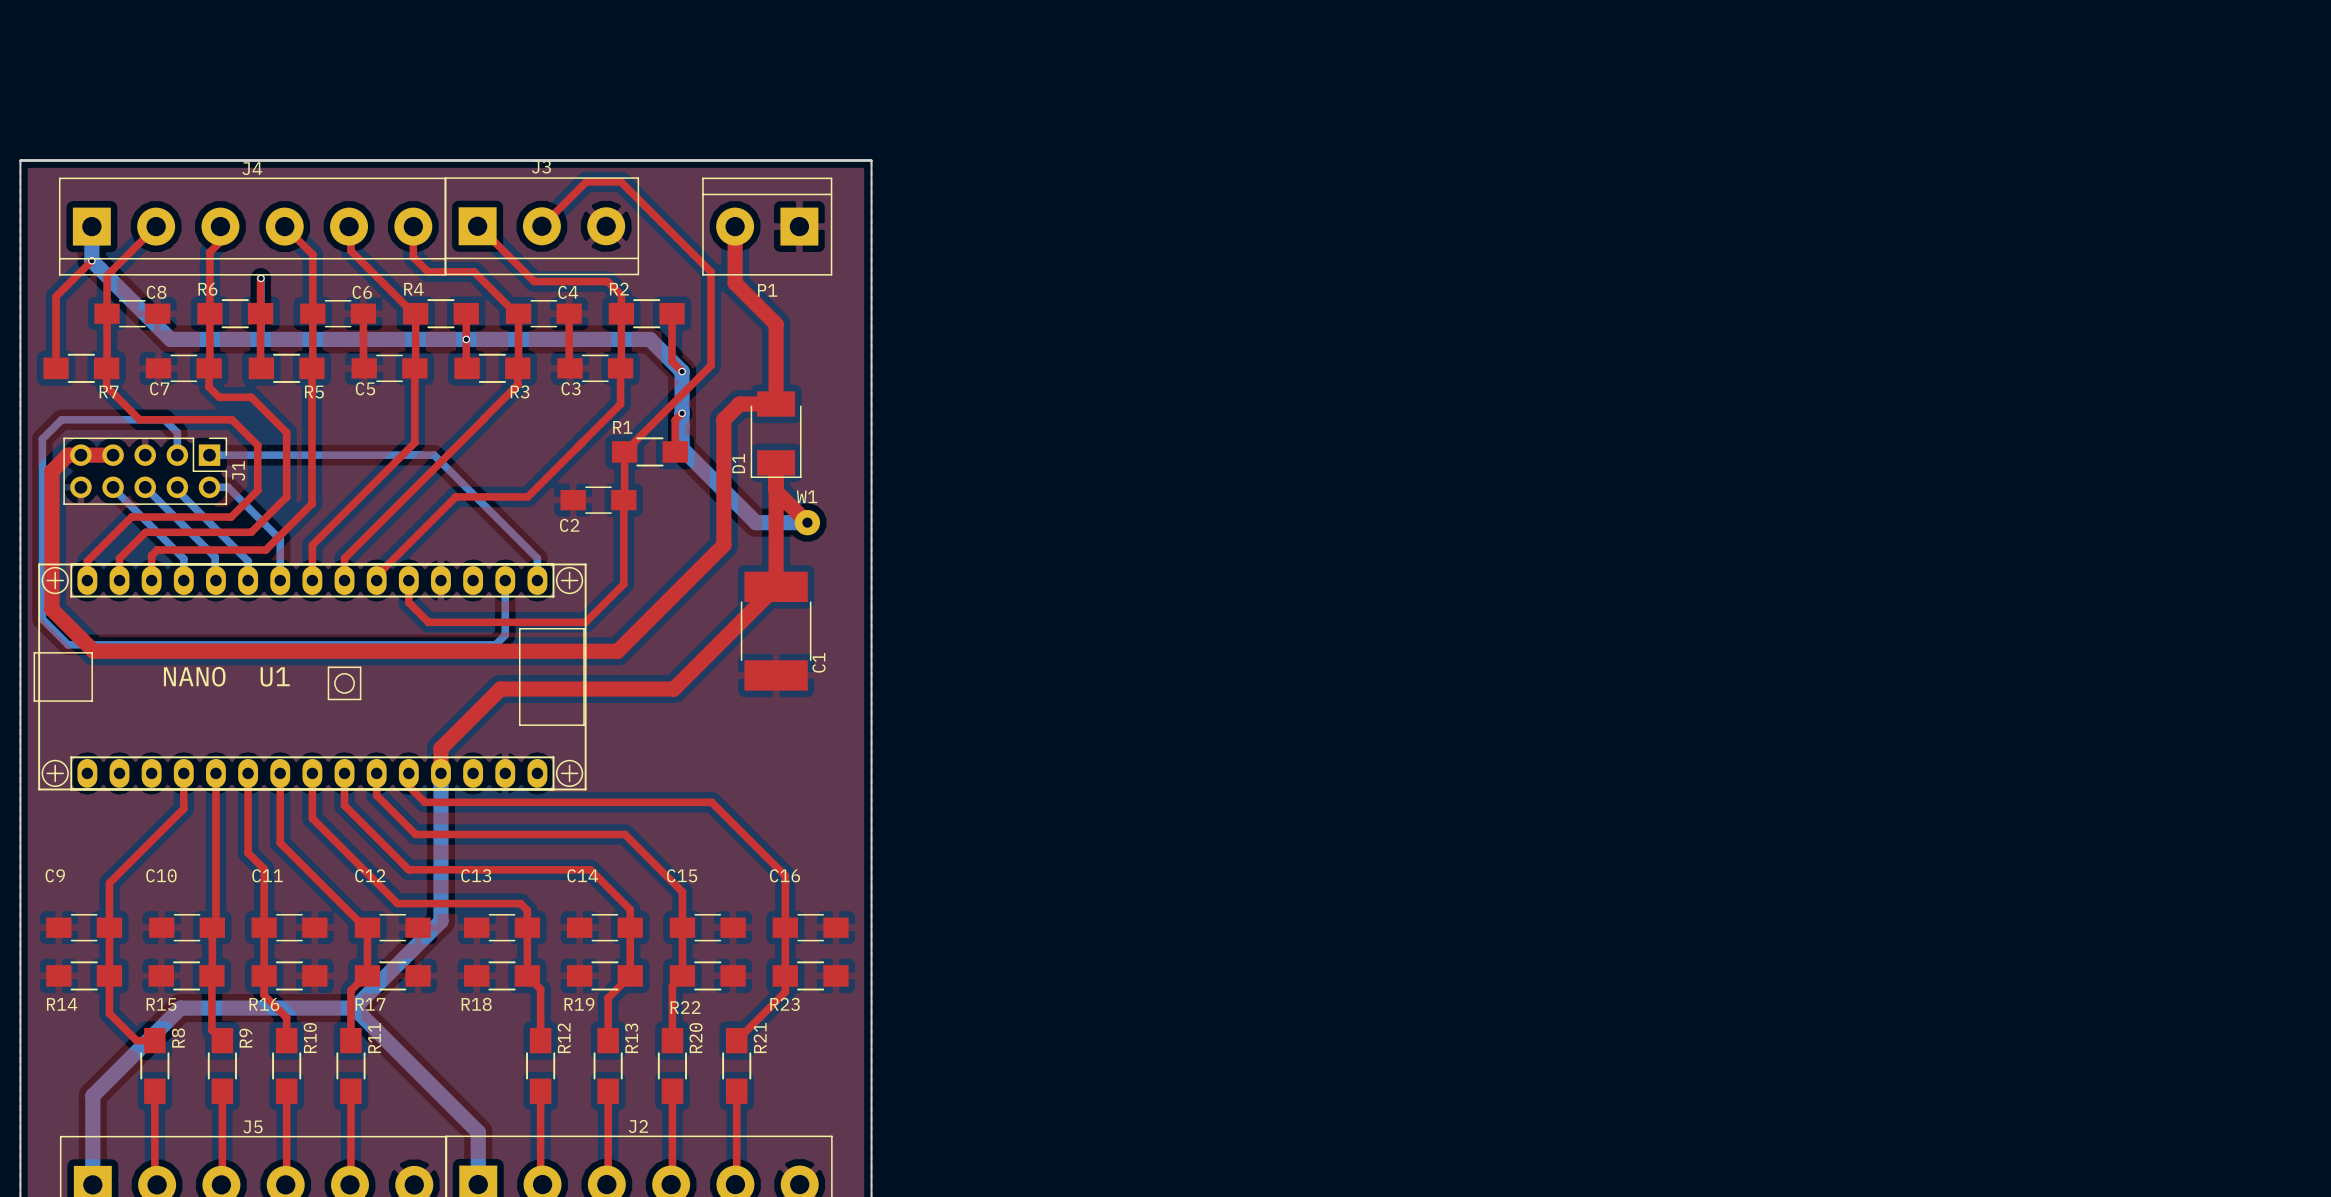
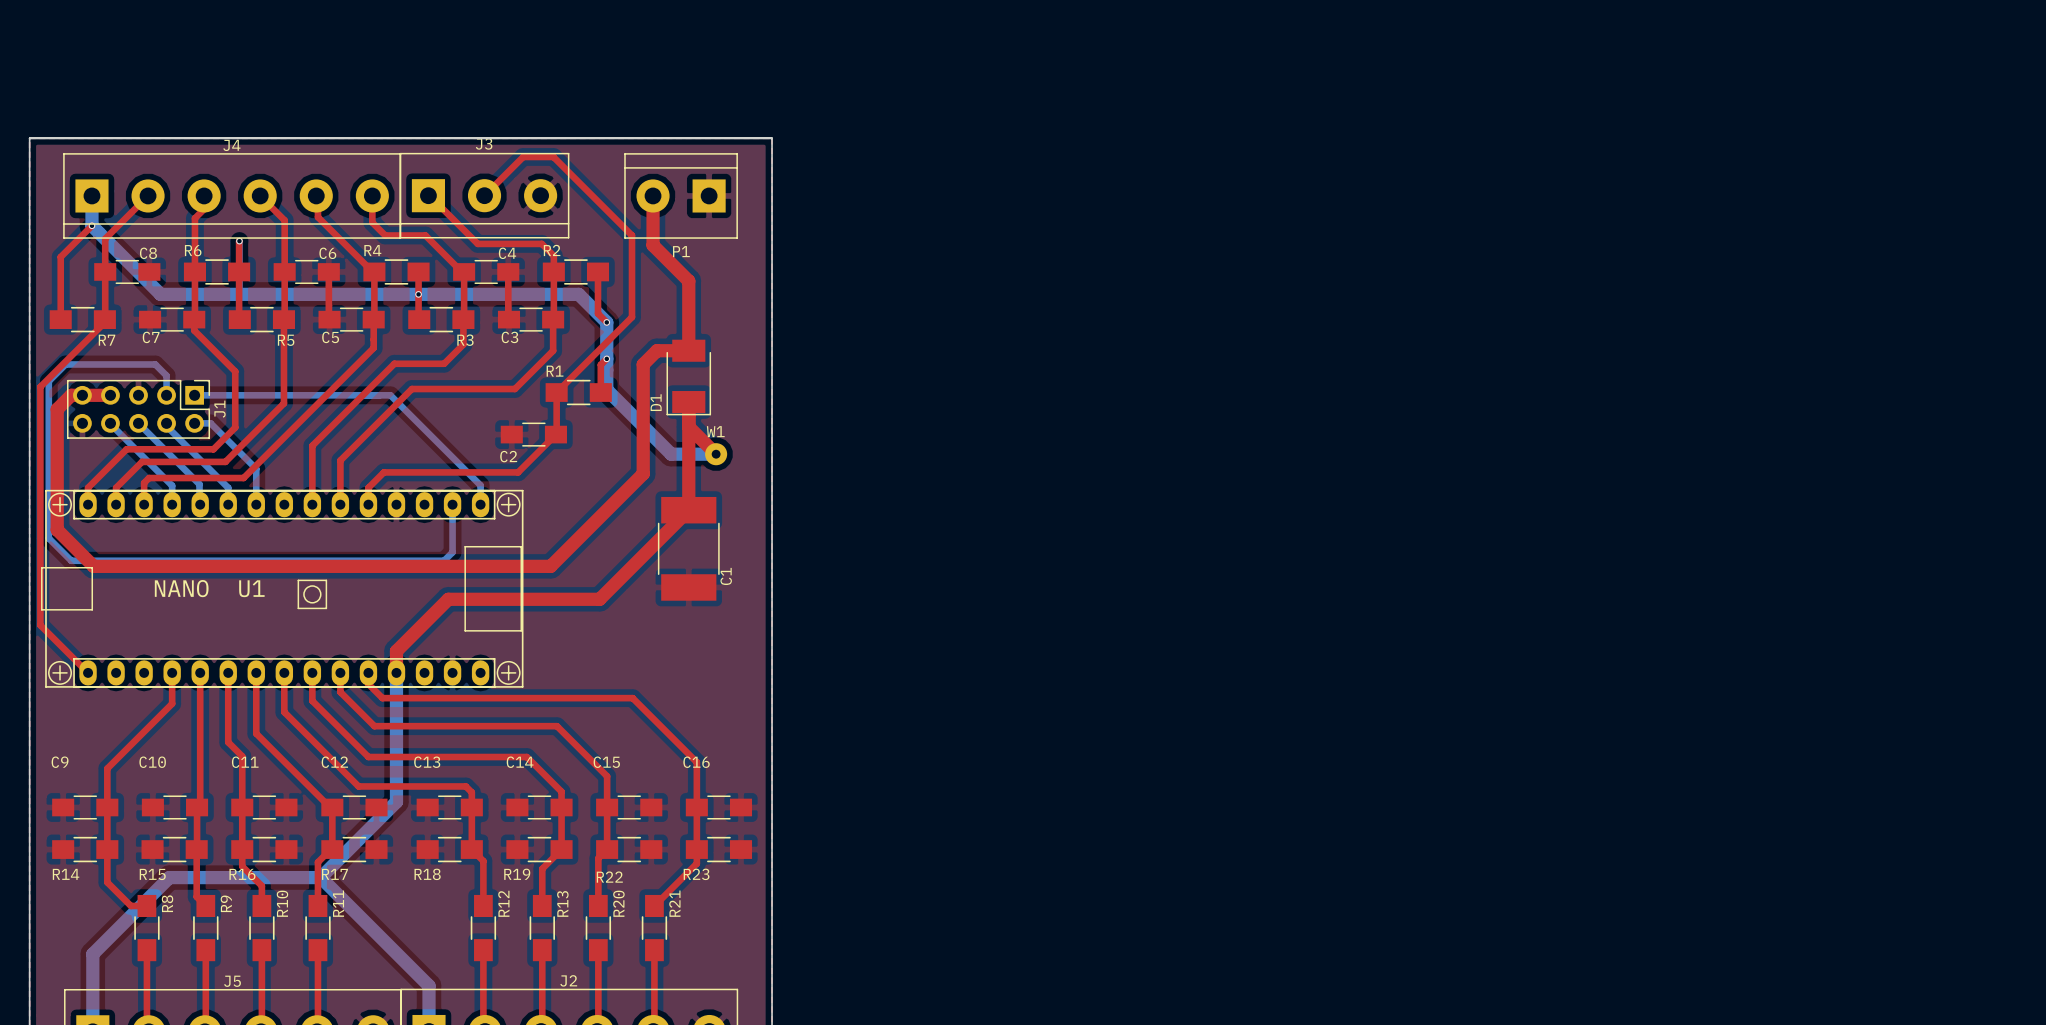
top track: (106, 371) (106, 386) (139, 419) (232, 419) (257, 445) (257, 490) (256, 492) -> (194, 330) (235, 371) (235, 427)
top track: none -> (104, 322) (40, 386) (40, 625) (88, 672)
top track: (209, 380) (209, 387) (219, 397) (251, 397) (286, 432) (286, 496) (251, 532) (145, 532) (119, 558) (119, 561) -> (283, 403) (225, 461) (142, 461) (116, 487)
top track: (517, 384) (344, 558) -> none
top track: (414, 400) (414, 442) -> (463, 333) (463, 344) (444, 363) (394, 363) (373, 384)
top track: (576, 447) (527, 496) (455, 496) (376, 576) -> (514, 389) (411, 389) (340, 460) (340, 500)
top track: (311, 464) (312, 503) -> (373, 348) (284, 437)
top track: (623, 500) (623, 584) (585, 622) (428, 622) (408, 602) (408, 580) -> (556, 433) (518, 472) (383, 472) (368, 487) (368, 504)
top track: (344, 513) (312, 545) (312, 580) -> (312, 445) (312, 485)

